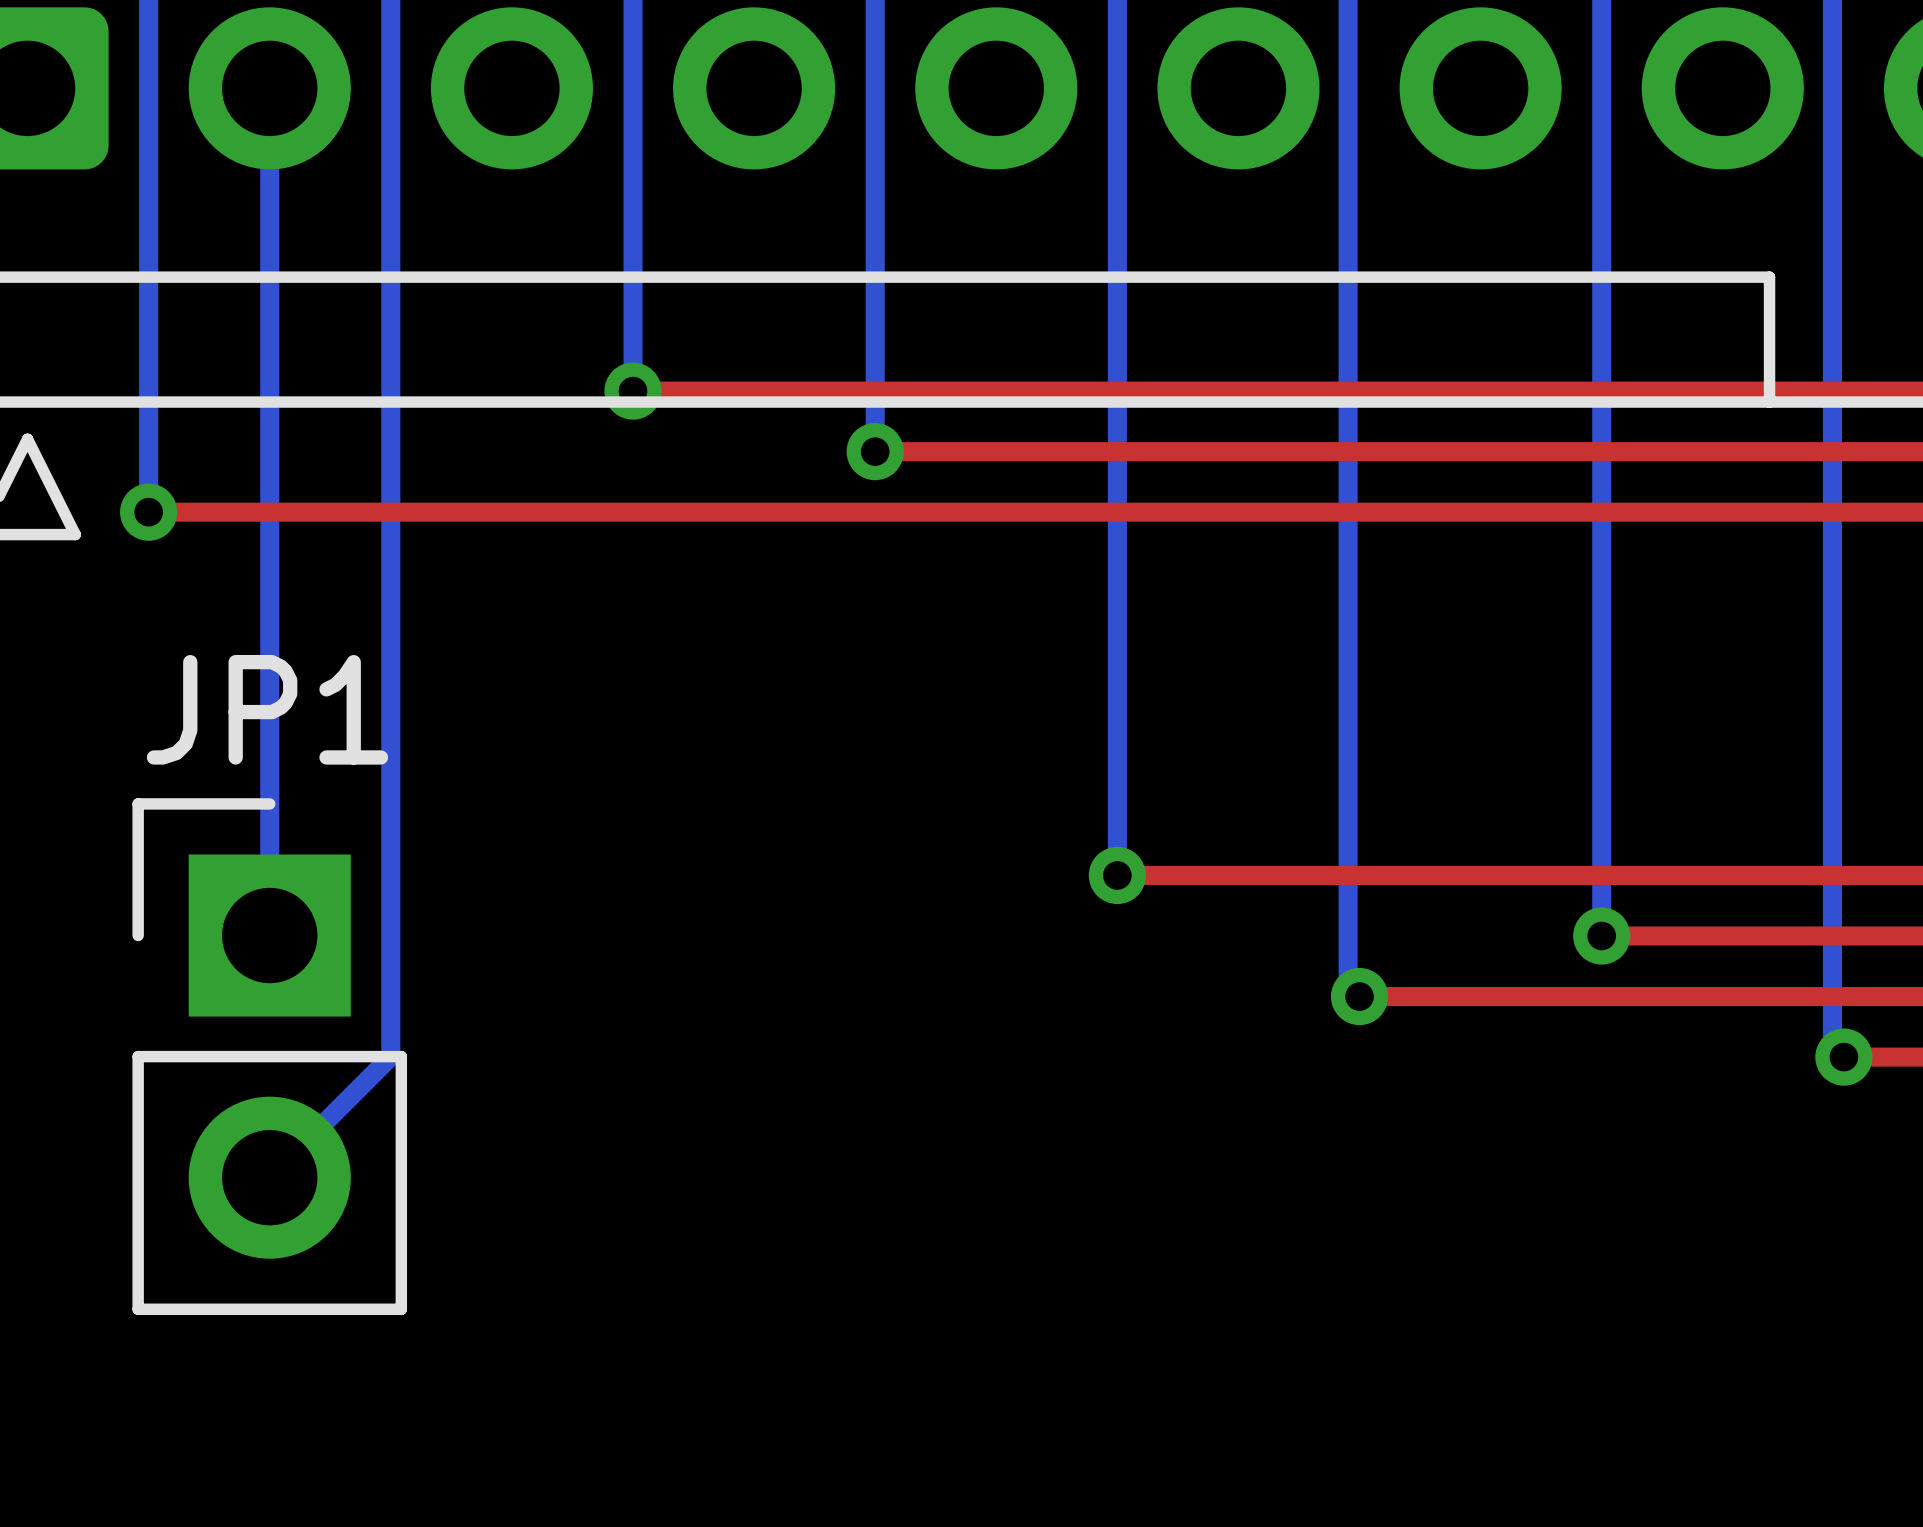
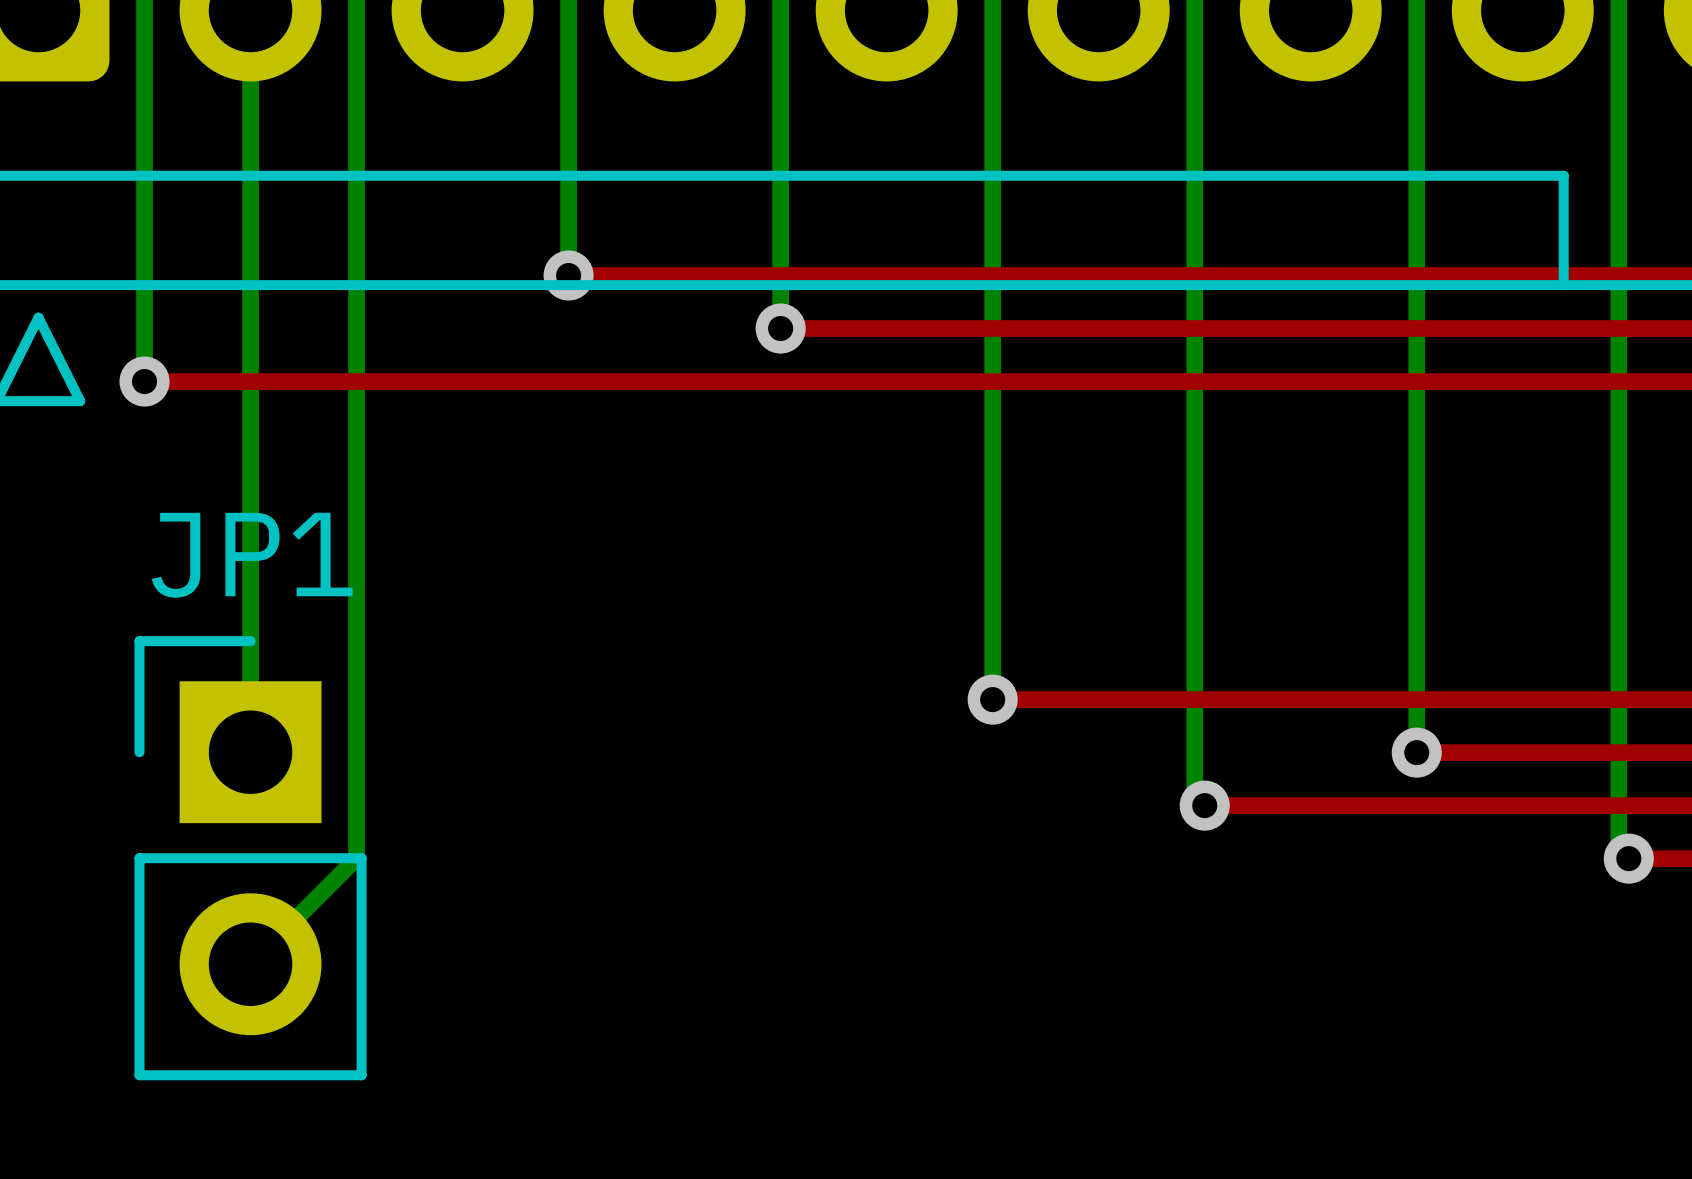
JP1 footprint: [132, 798, 408, 1315] -> [134, 636, 367, 1081]

